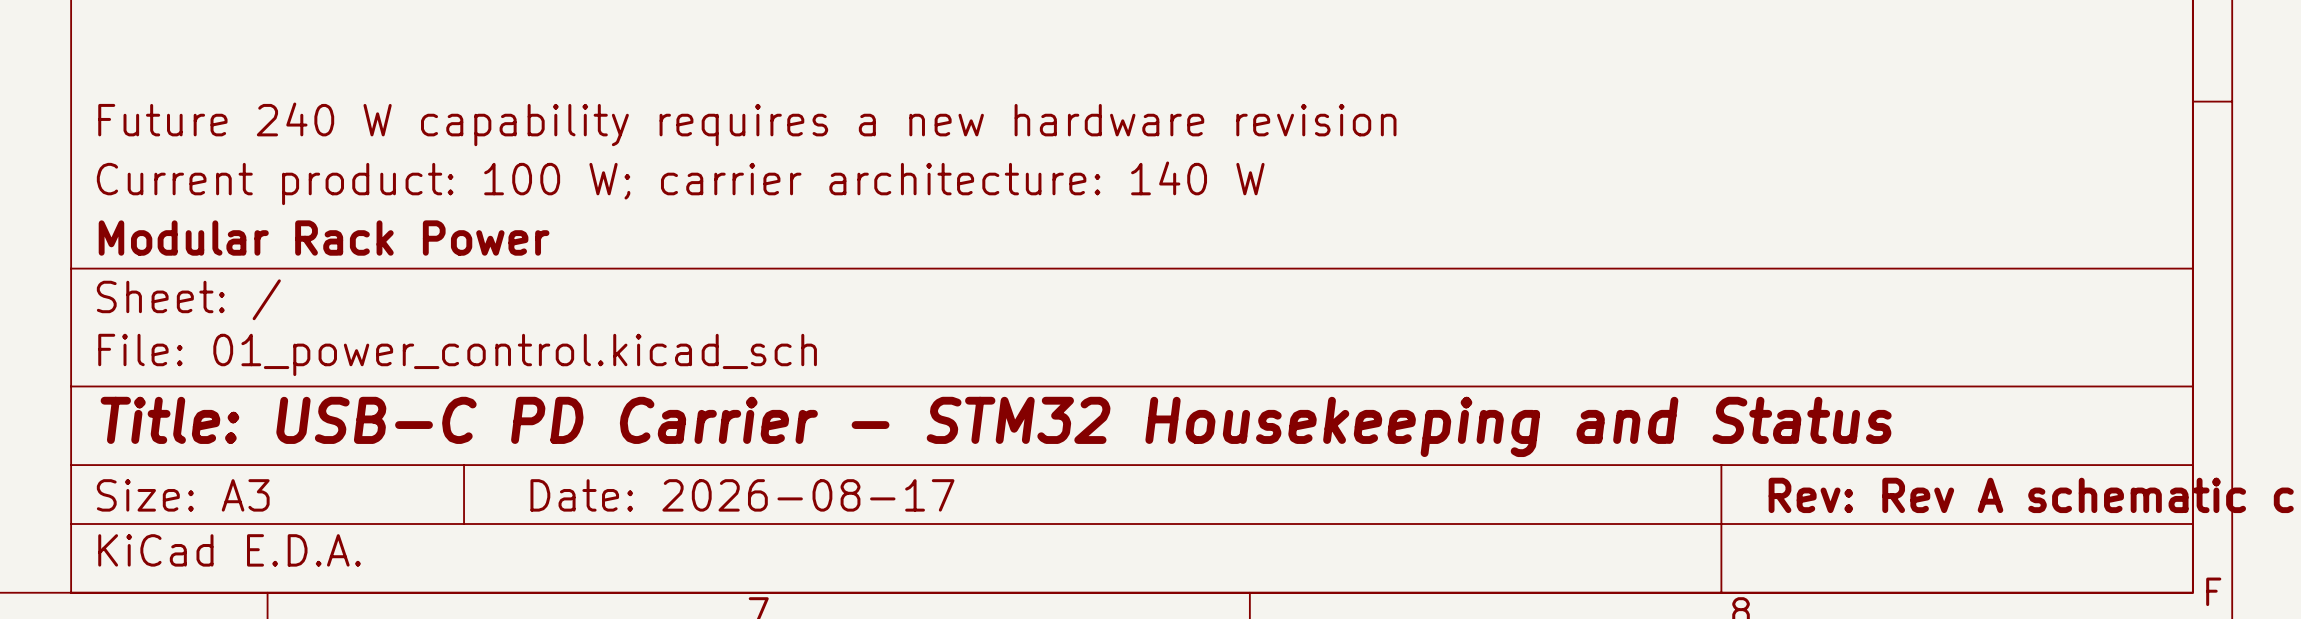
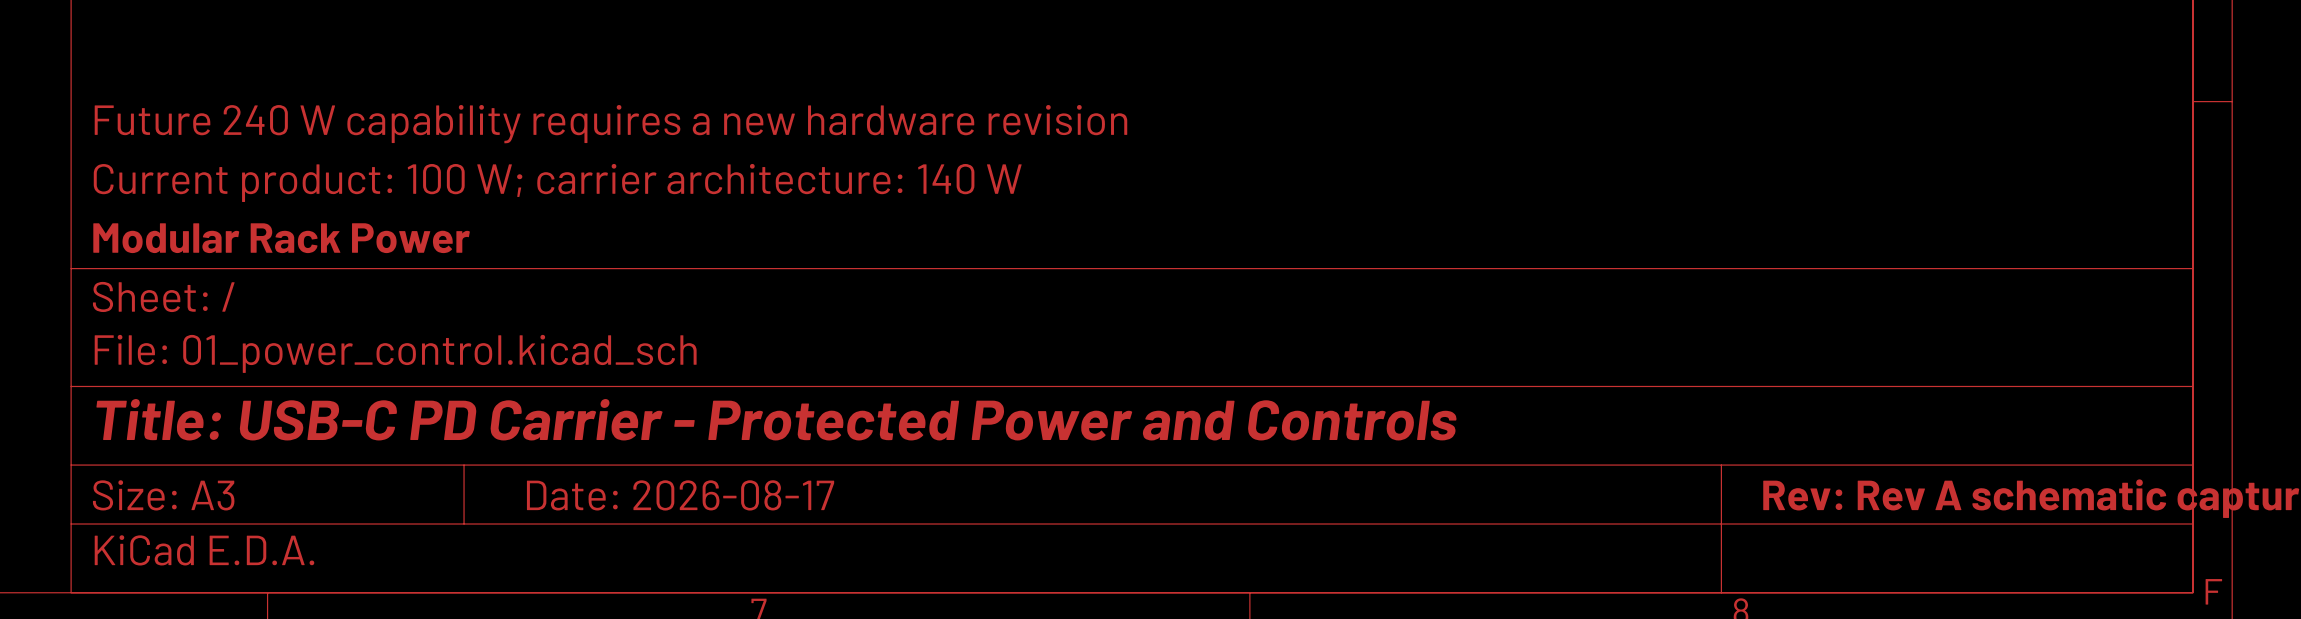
title block: Title: USB-C PD Carrier - STM32 Housekeeping and Status (996, 426) -> Title: USB-C PD Carrier - Protected Power and Controls (776, 419)

